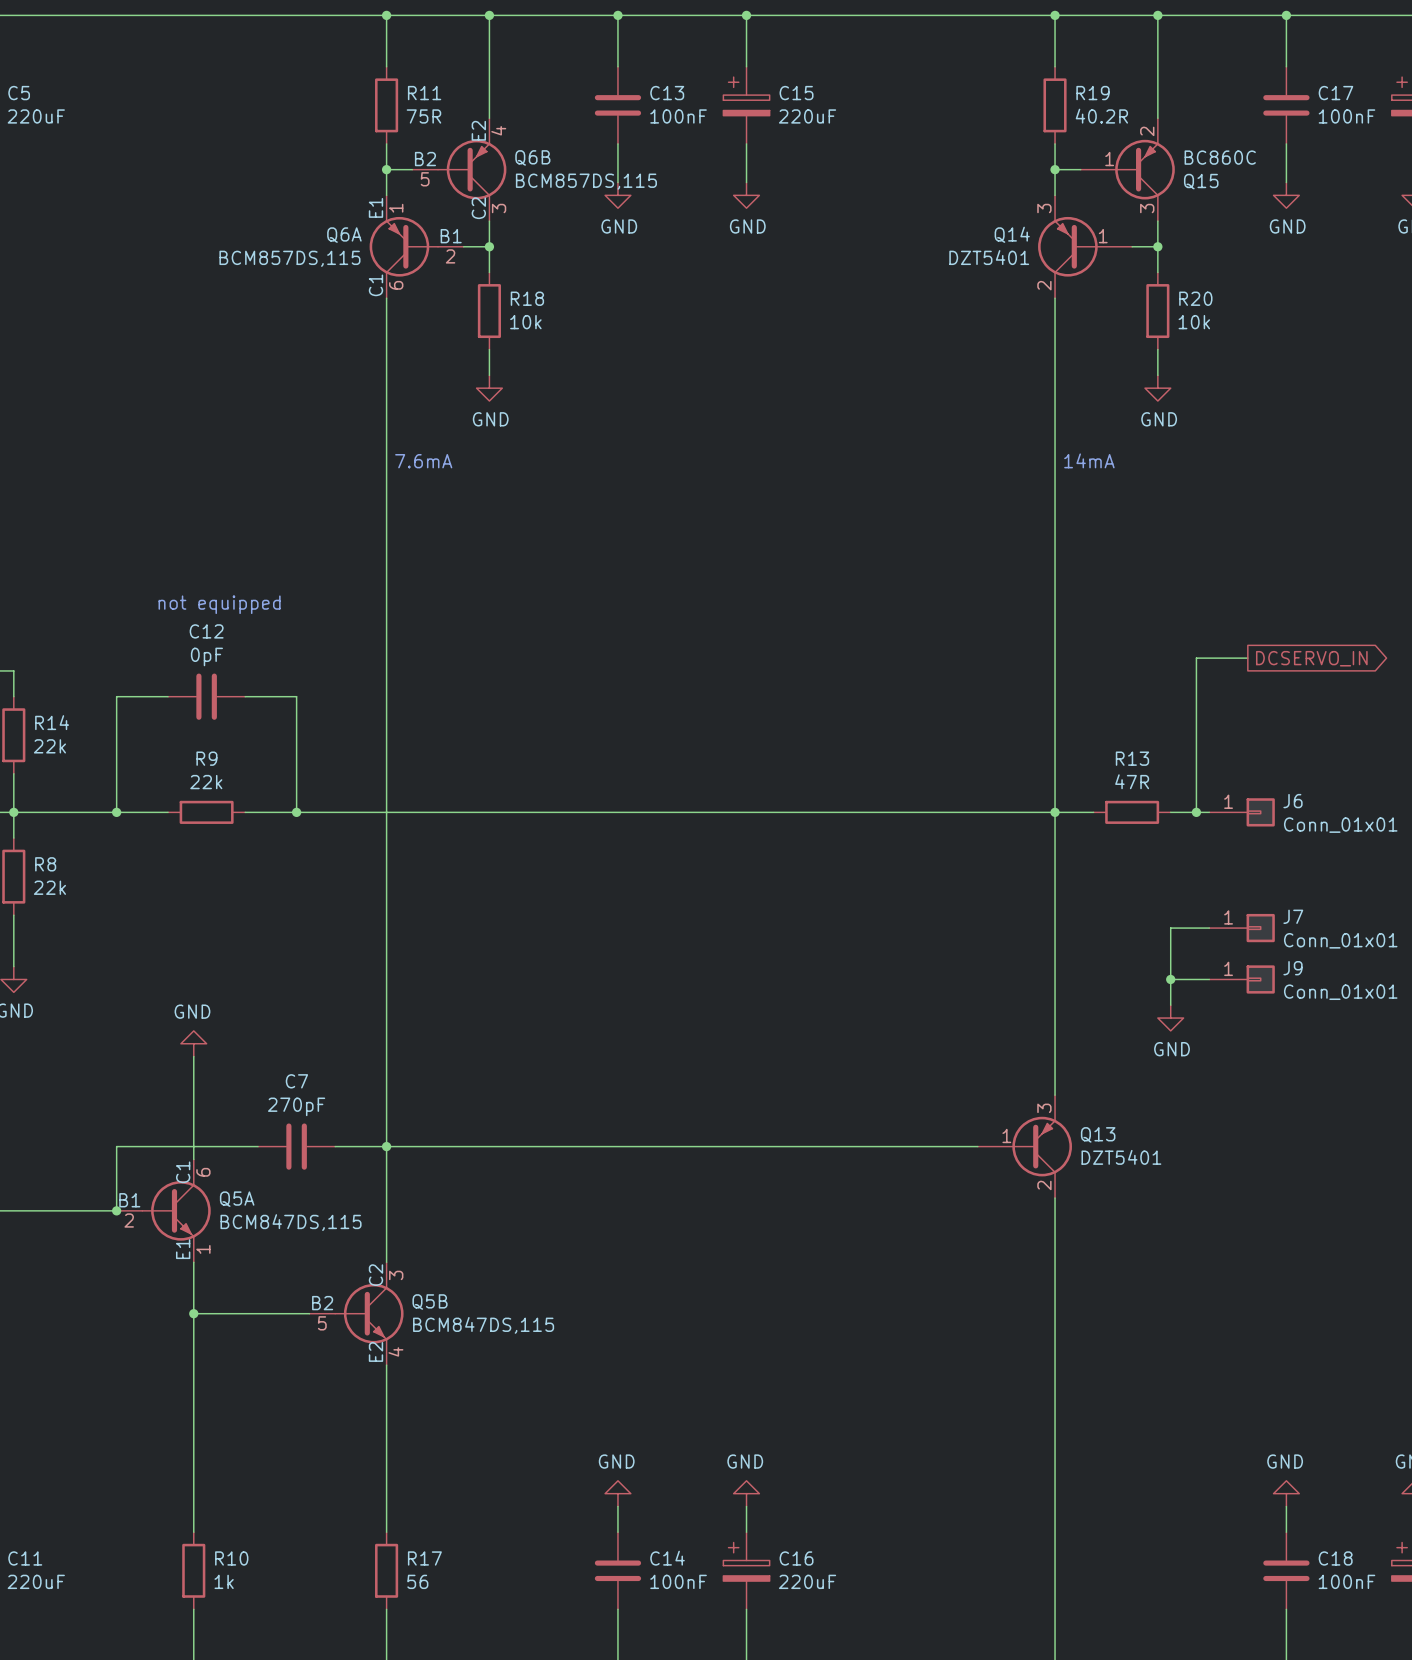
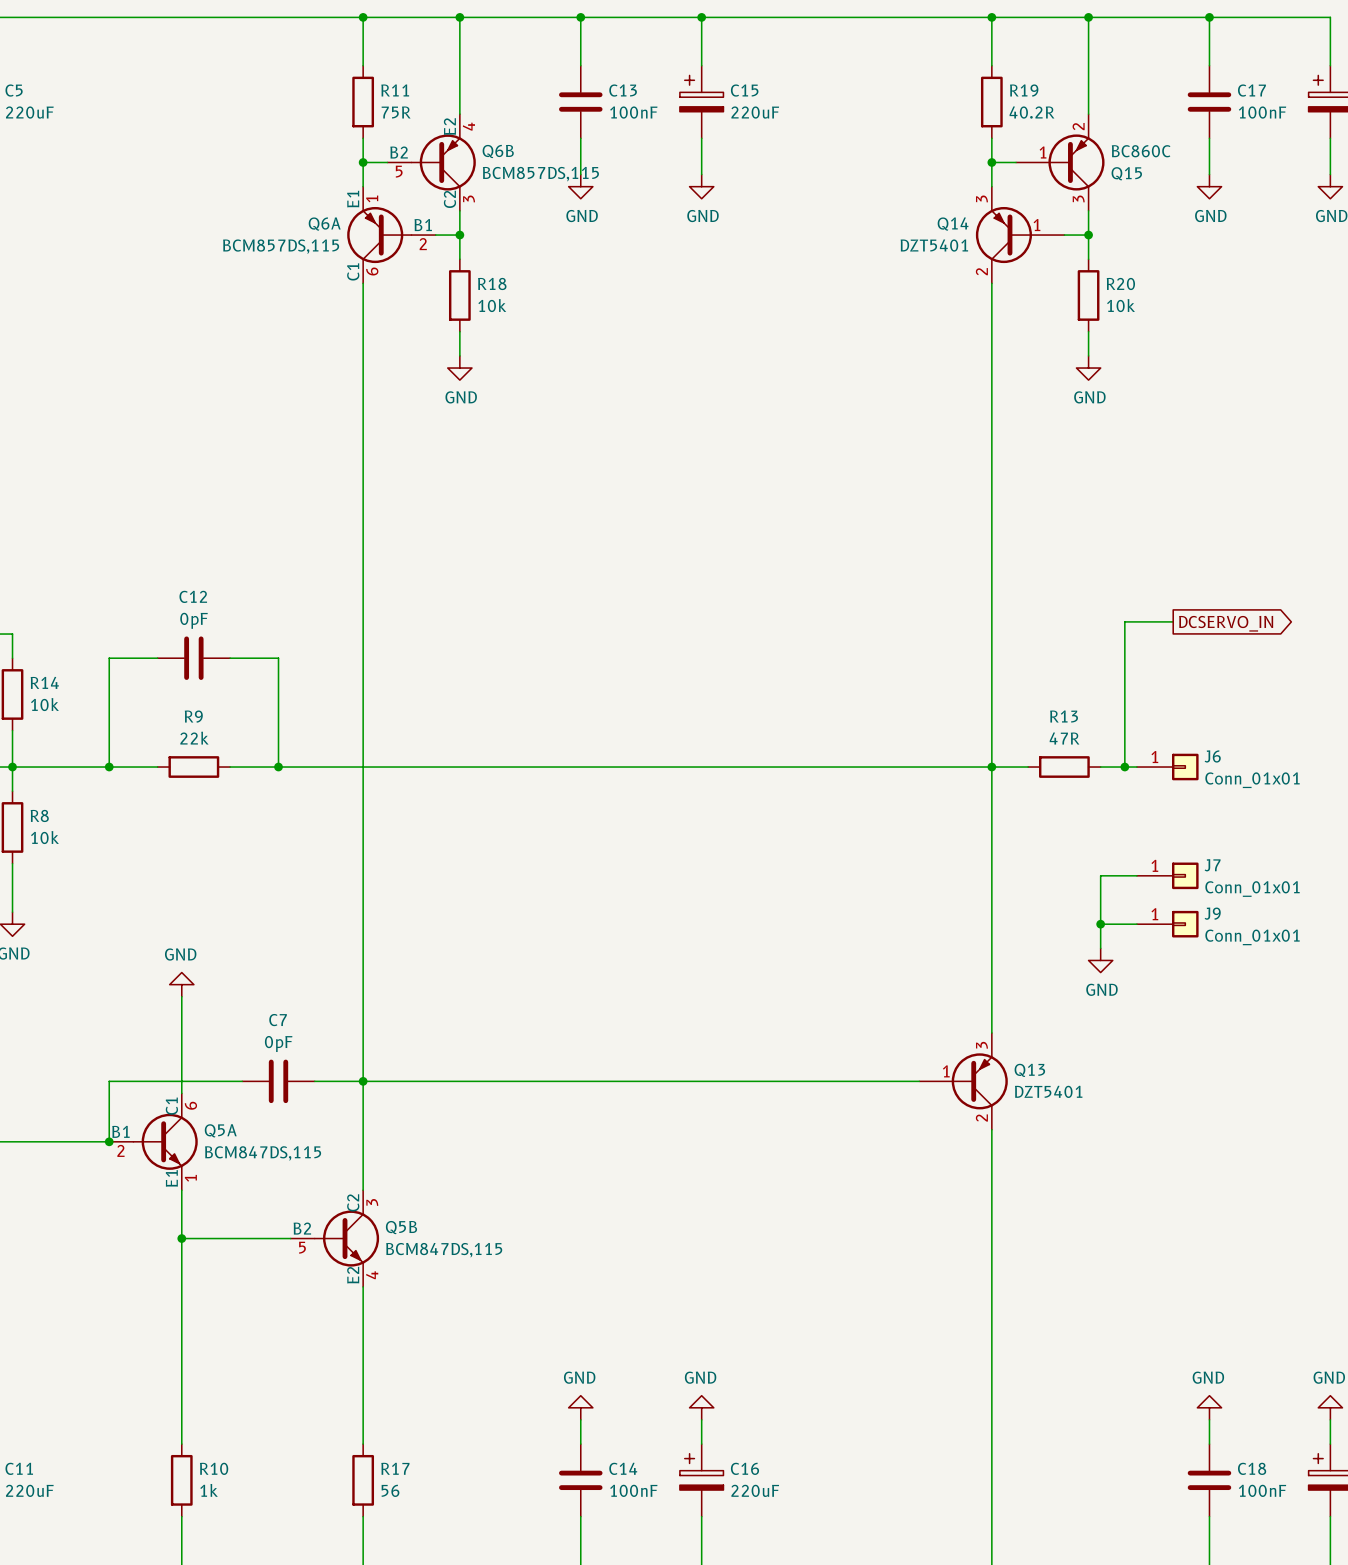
text: 14mA (1089, 460) -> none
text: 7.6mA (423, 461) -> none
text: not equipped (219, 604) -> none
R14 value: 22k (49, 746) -> 10k (44, 704)
R8 value: 22k (49, 887) -> 10k (44, 837)
C7 value: 270pF (296, 1106) -> 0pF (278, 1043)

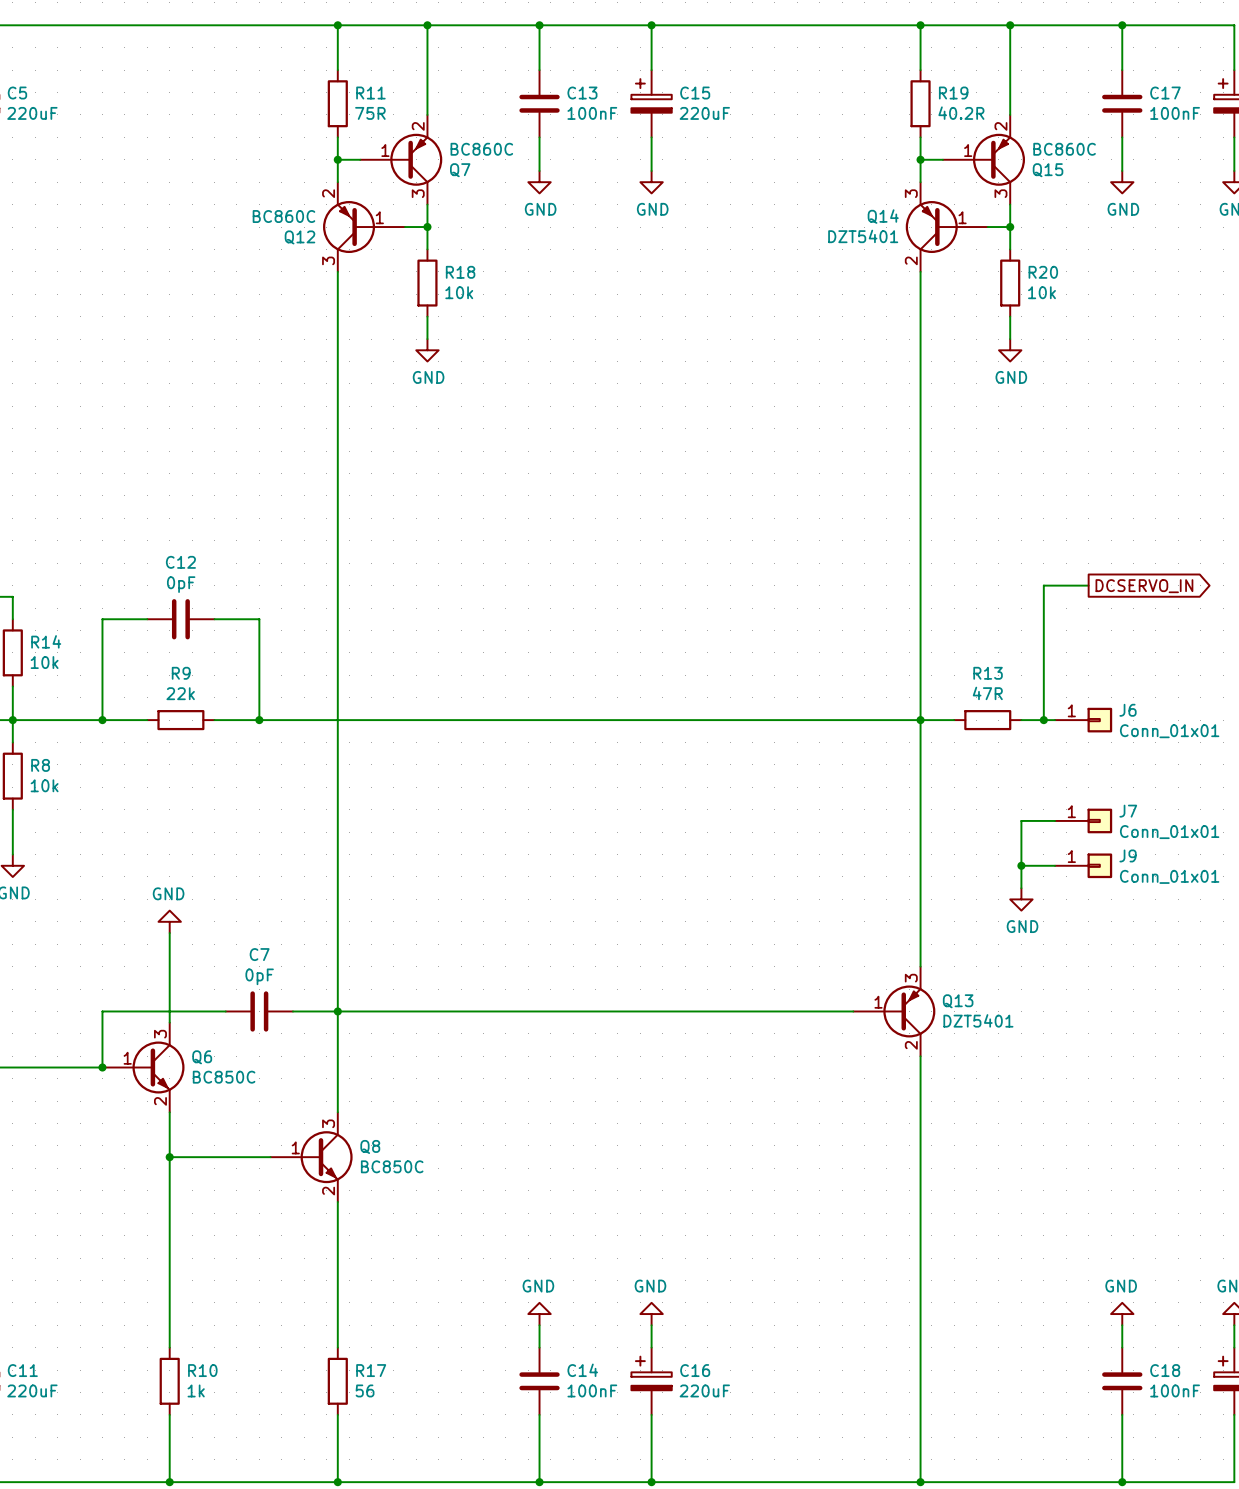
Q6B: BCM857DS,115 (431, 162) -> none
Q7: none -> BC860C (401, 159)
Q6A: BCM857DS,115 (391, 235) -> none
Q12: none -> BC860C (364, 227)
Q5A: BCM847DS,115 (153, 1141) -> none
Q6: none -> BC850C (143, 1067)
Q5B: BCM847DS,115 (334, 1238) -> none
Q8: none -> BC850C (311, 1157)

